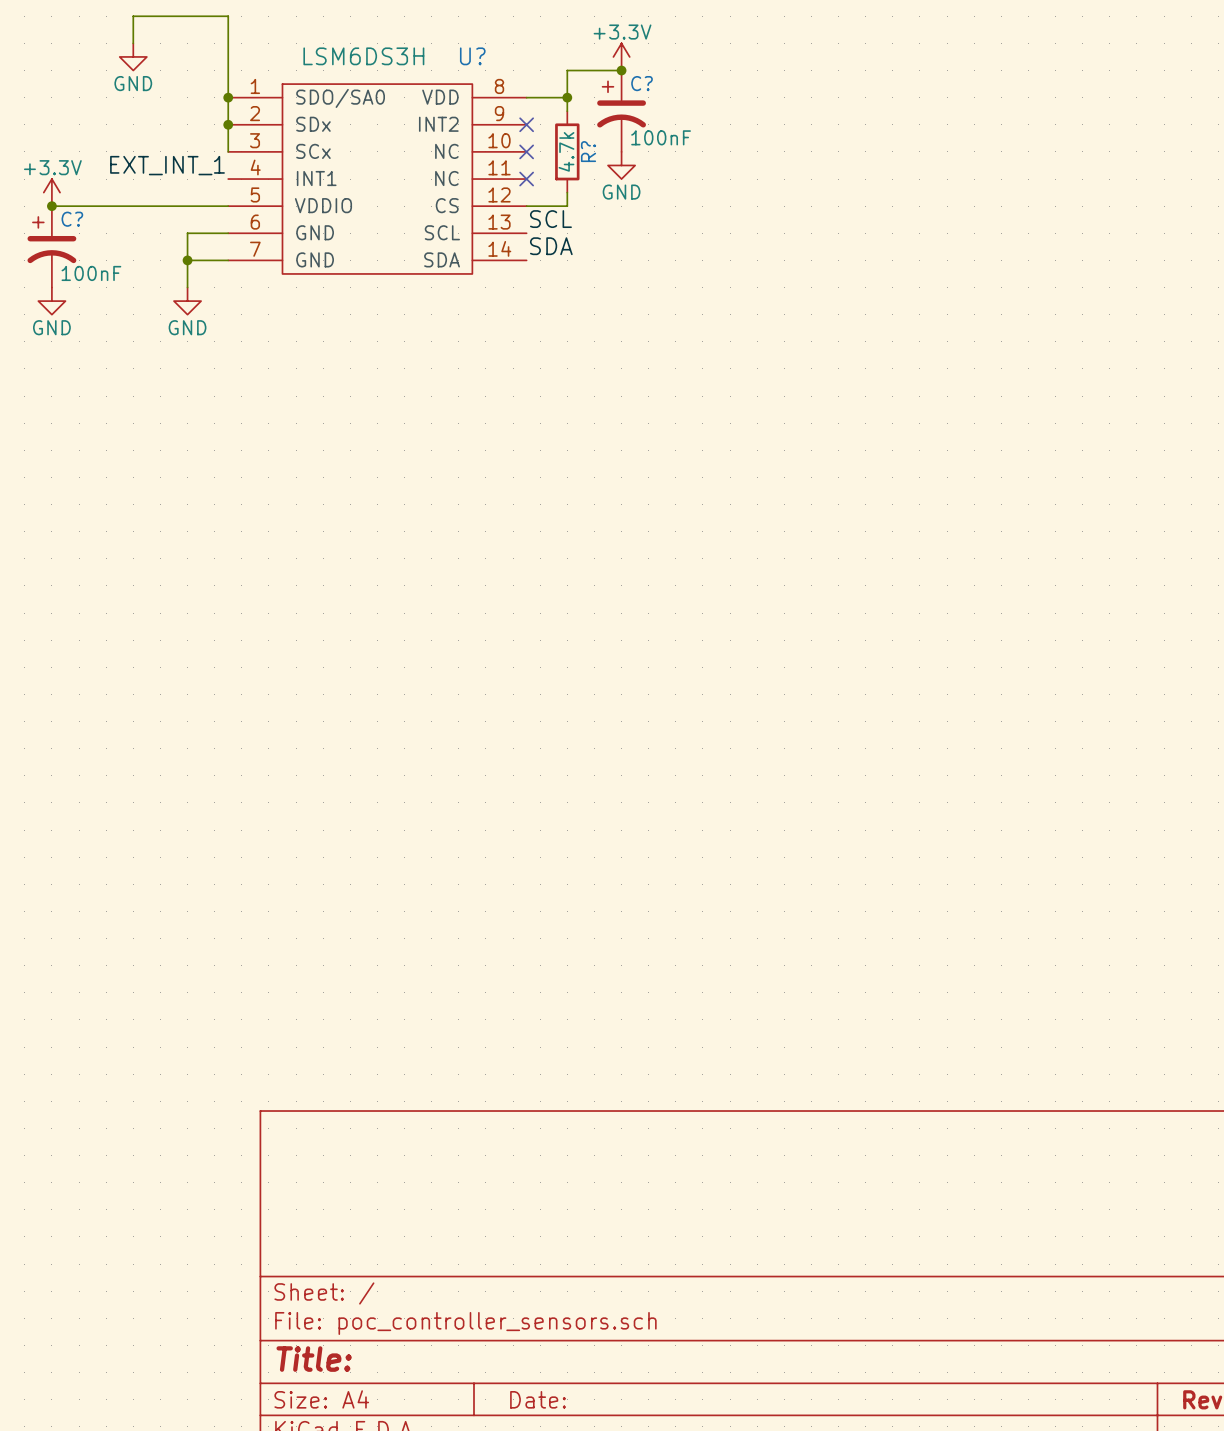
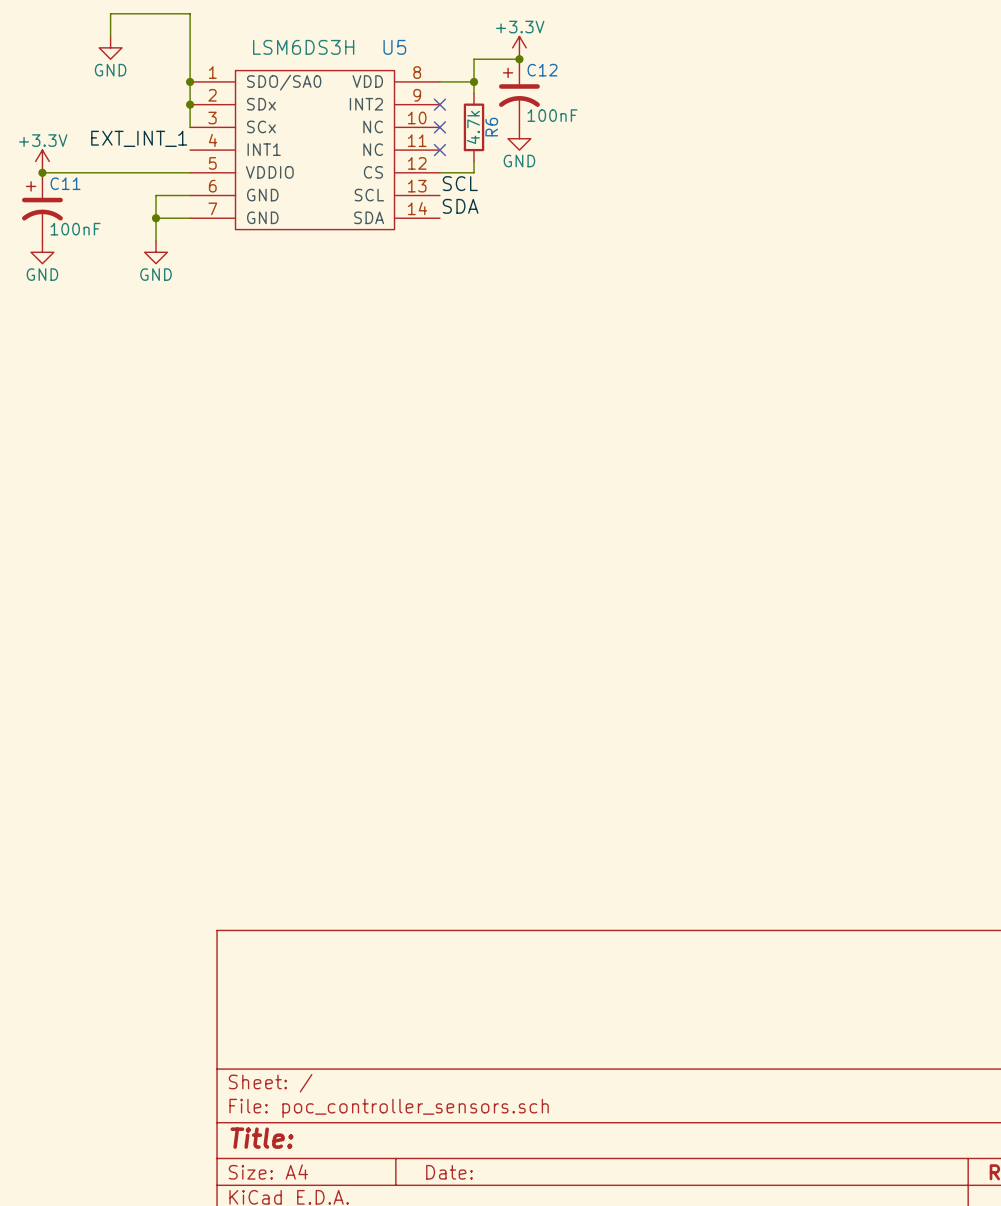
U? name: U? (472, 56) -> U5 (394, 47)
C? name: C? (642, 83) -> C12 (542, 70)
R? name: R? (588, 151) -> R6 (491, 127)
C? name: C? (72, 219) -> C11 (65, 183)

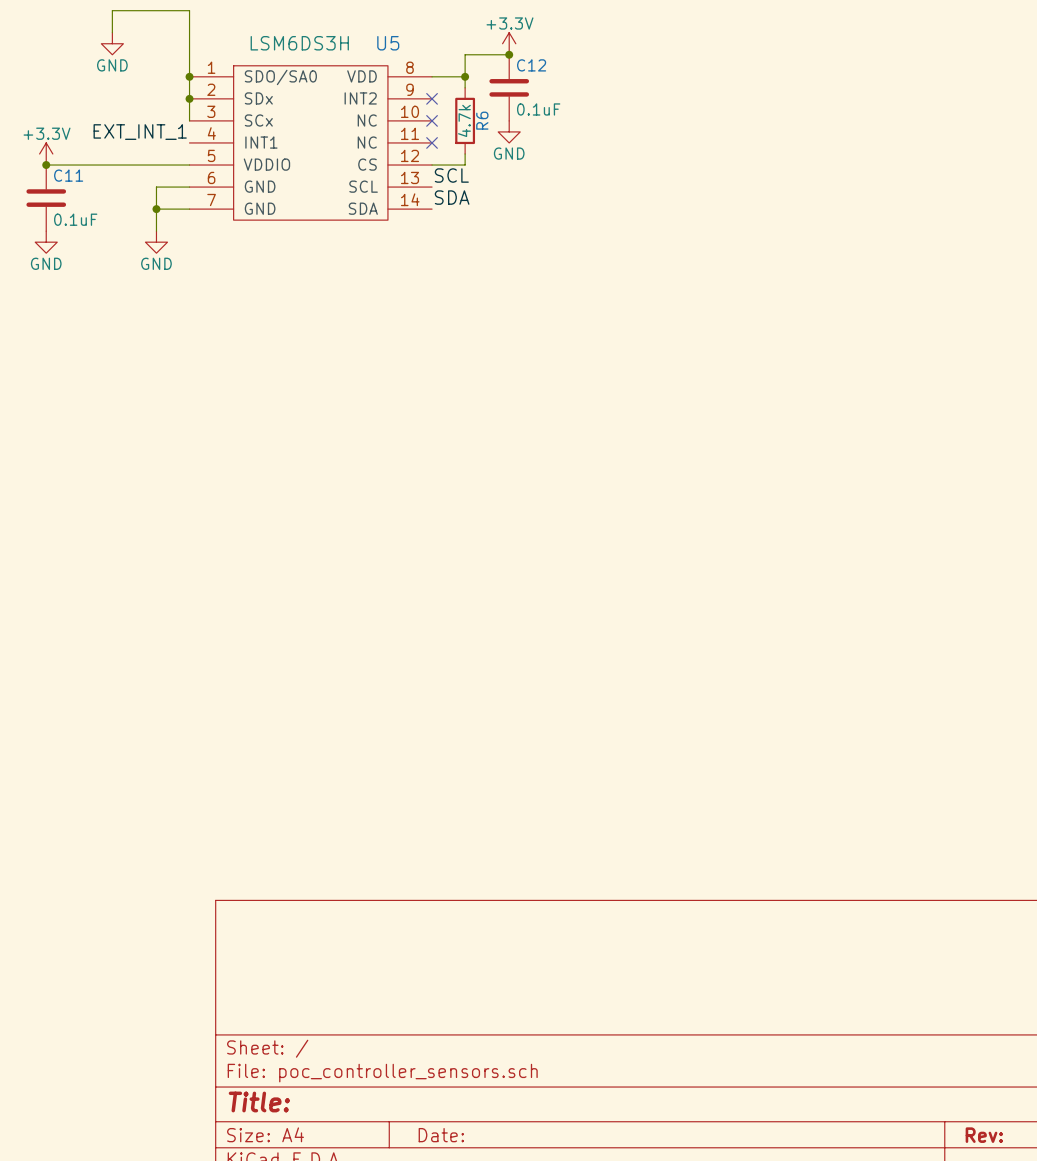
C12 symbol: [498, 59, 540, 128] -> [489, 54, 530, 121]
C12 value: 100nF (552, 115) -> 0.1uF (538, 109)
C11 symbol: [22, 172, 63, 241] -> [26, 165, 67, 232]
C11 value: 100nF (75, 229) -> 0.1uF (75, 219)

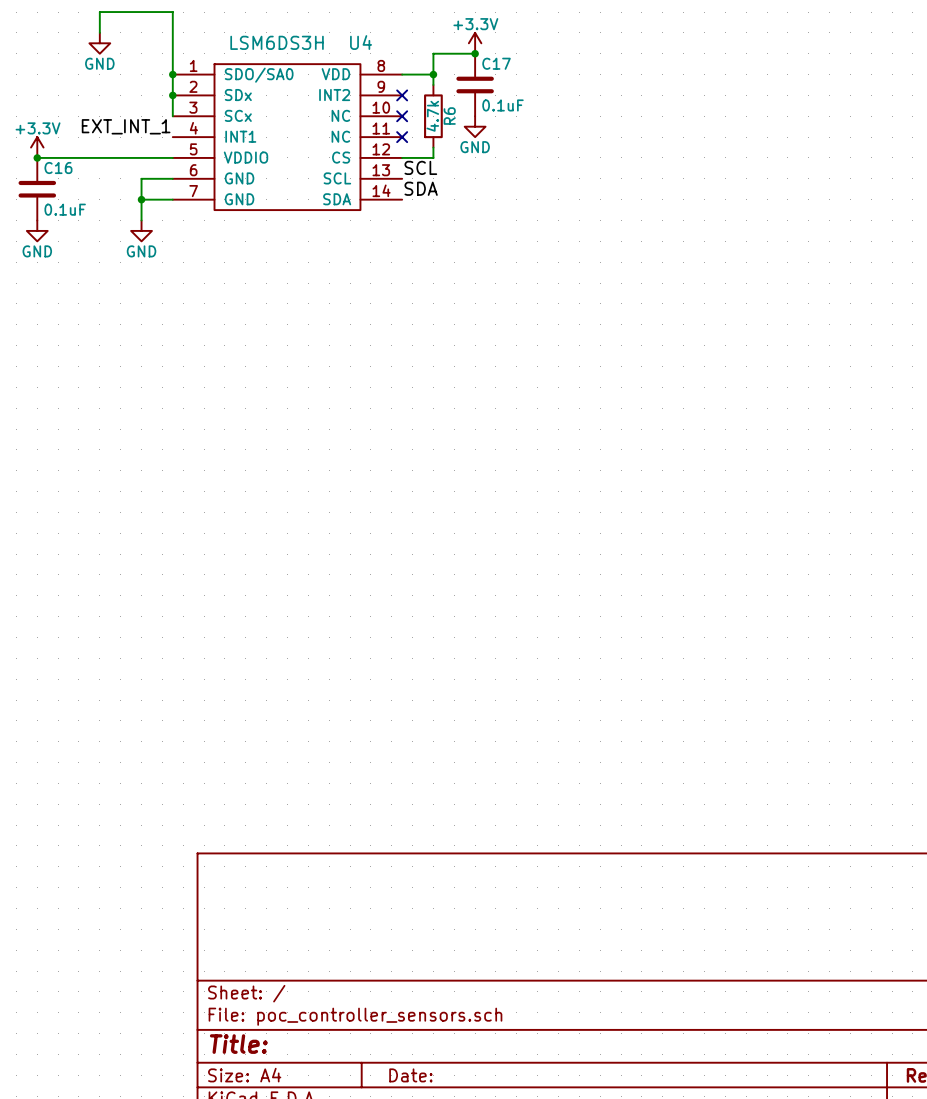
U5 name: U5 (388, 43) -> U4 (361, 42)
C12 name: C12 (531, 65) -> C17 (496, 63)
C11 name: C11 (68, 175) -> C16 (58, 168)

